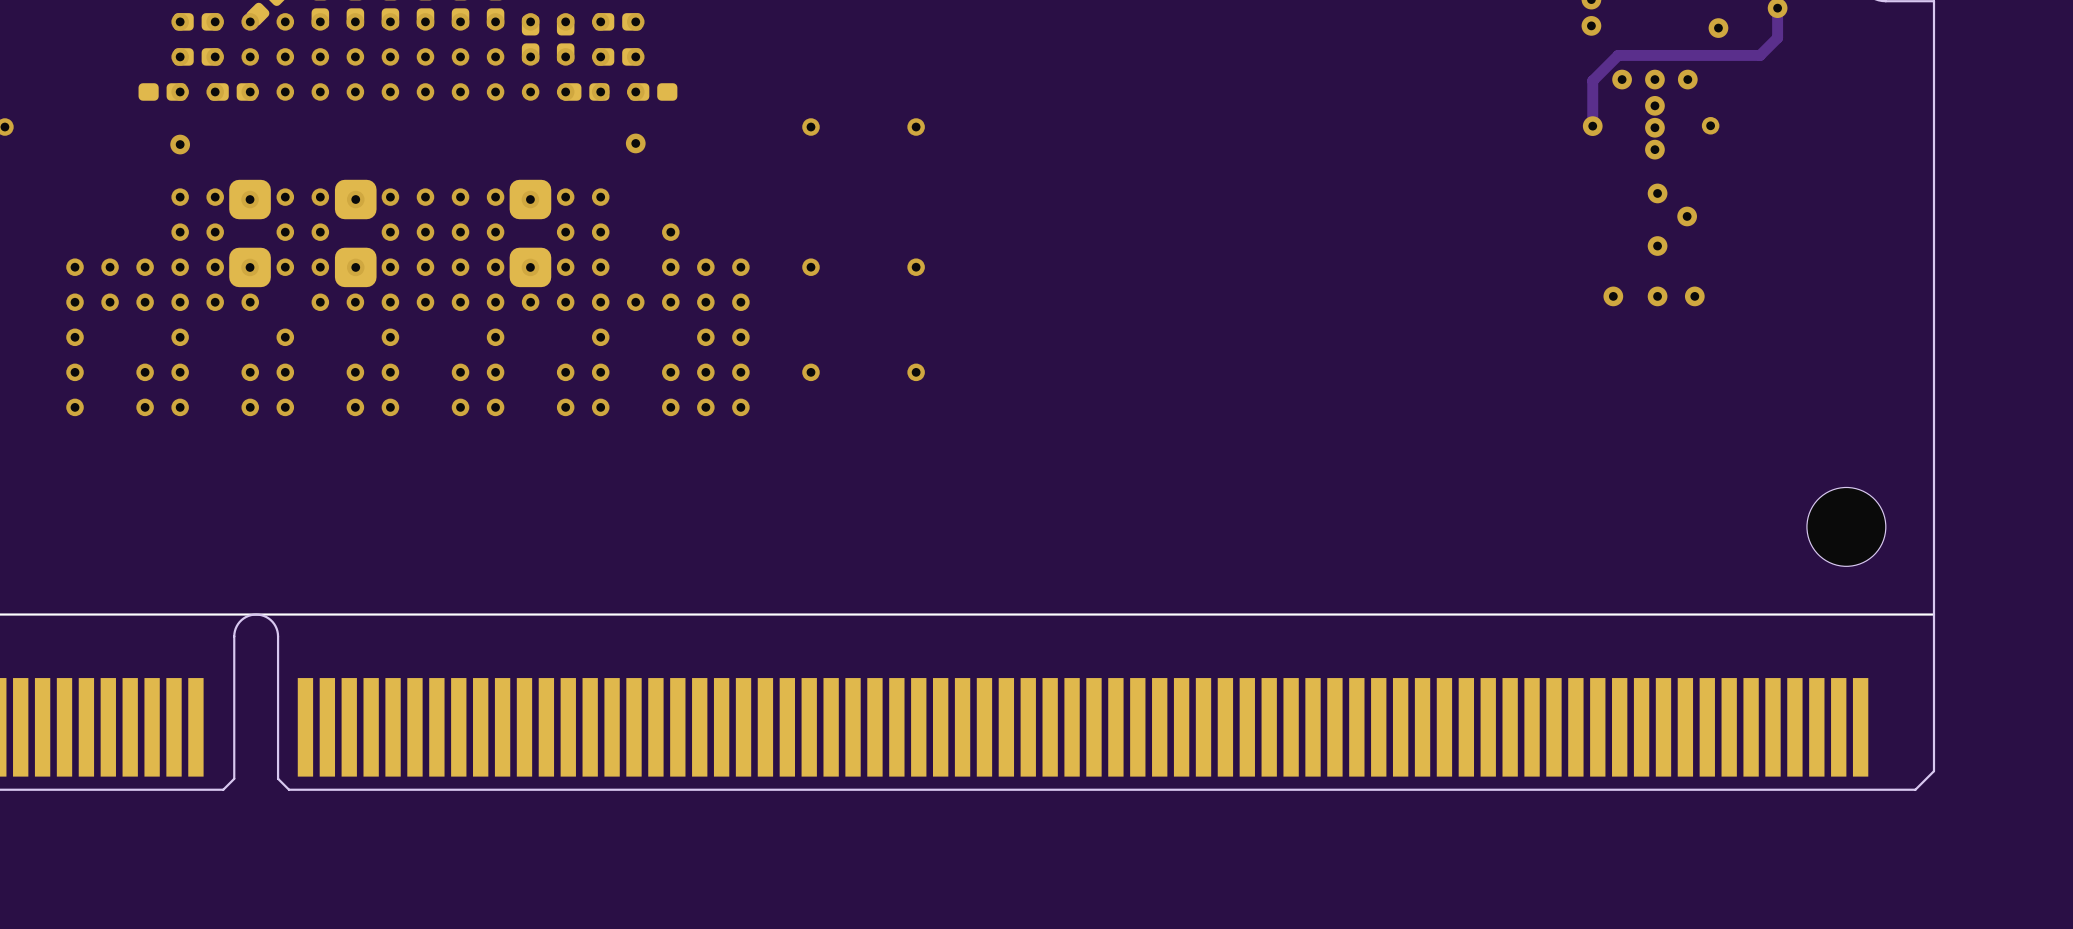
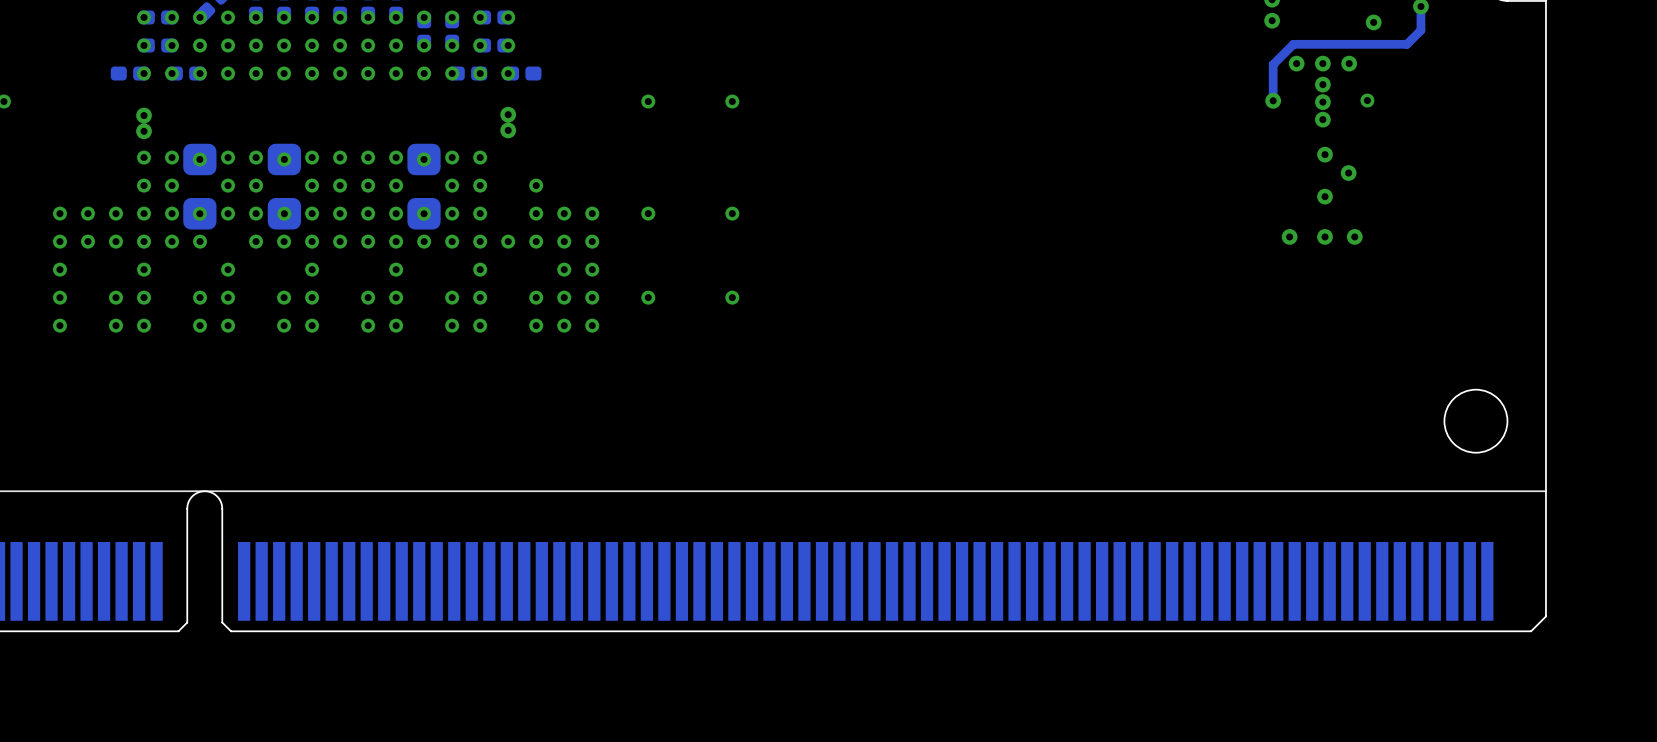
via: none -> (508, 130)
via: none -> (144, 131)

